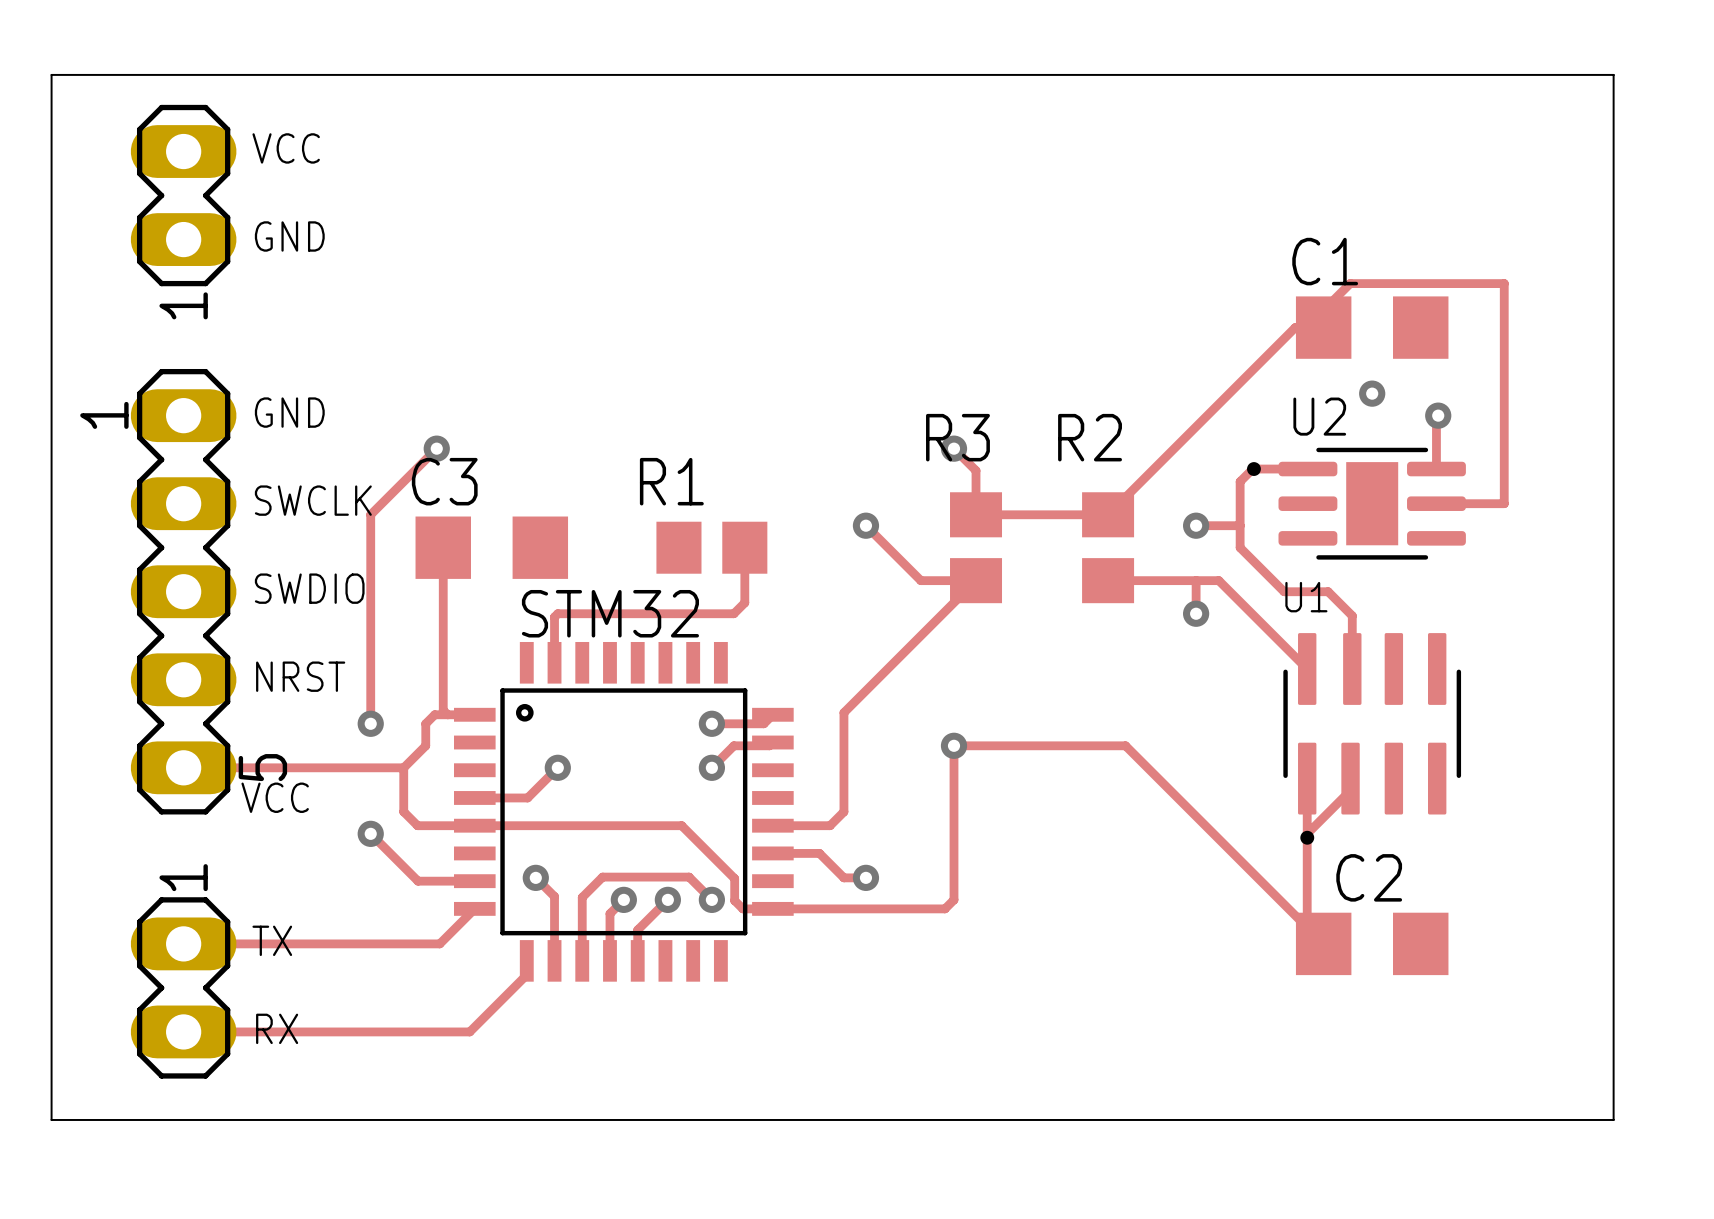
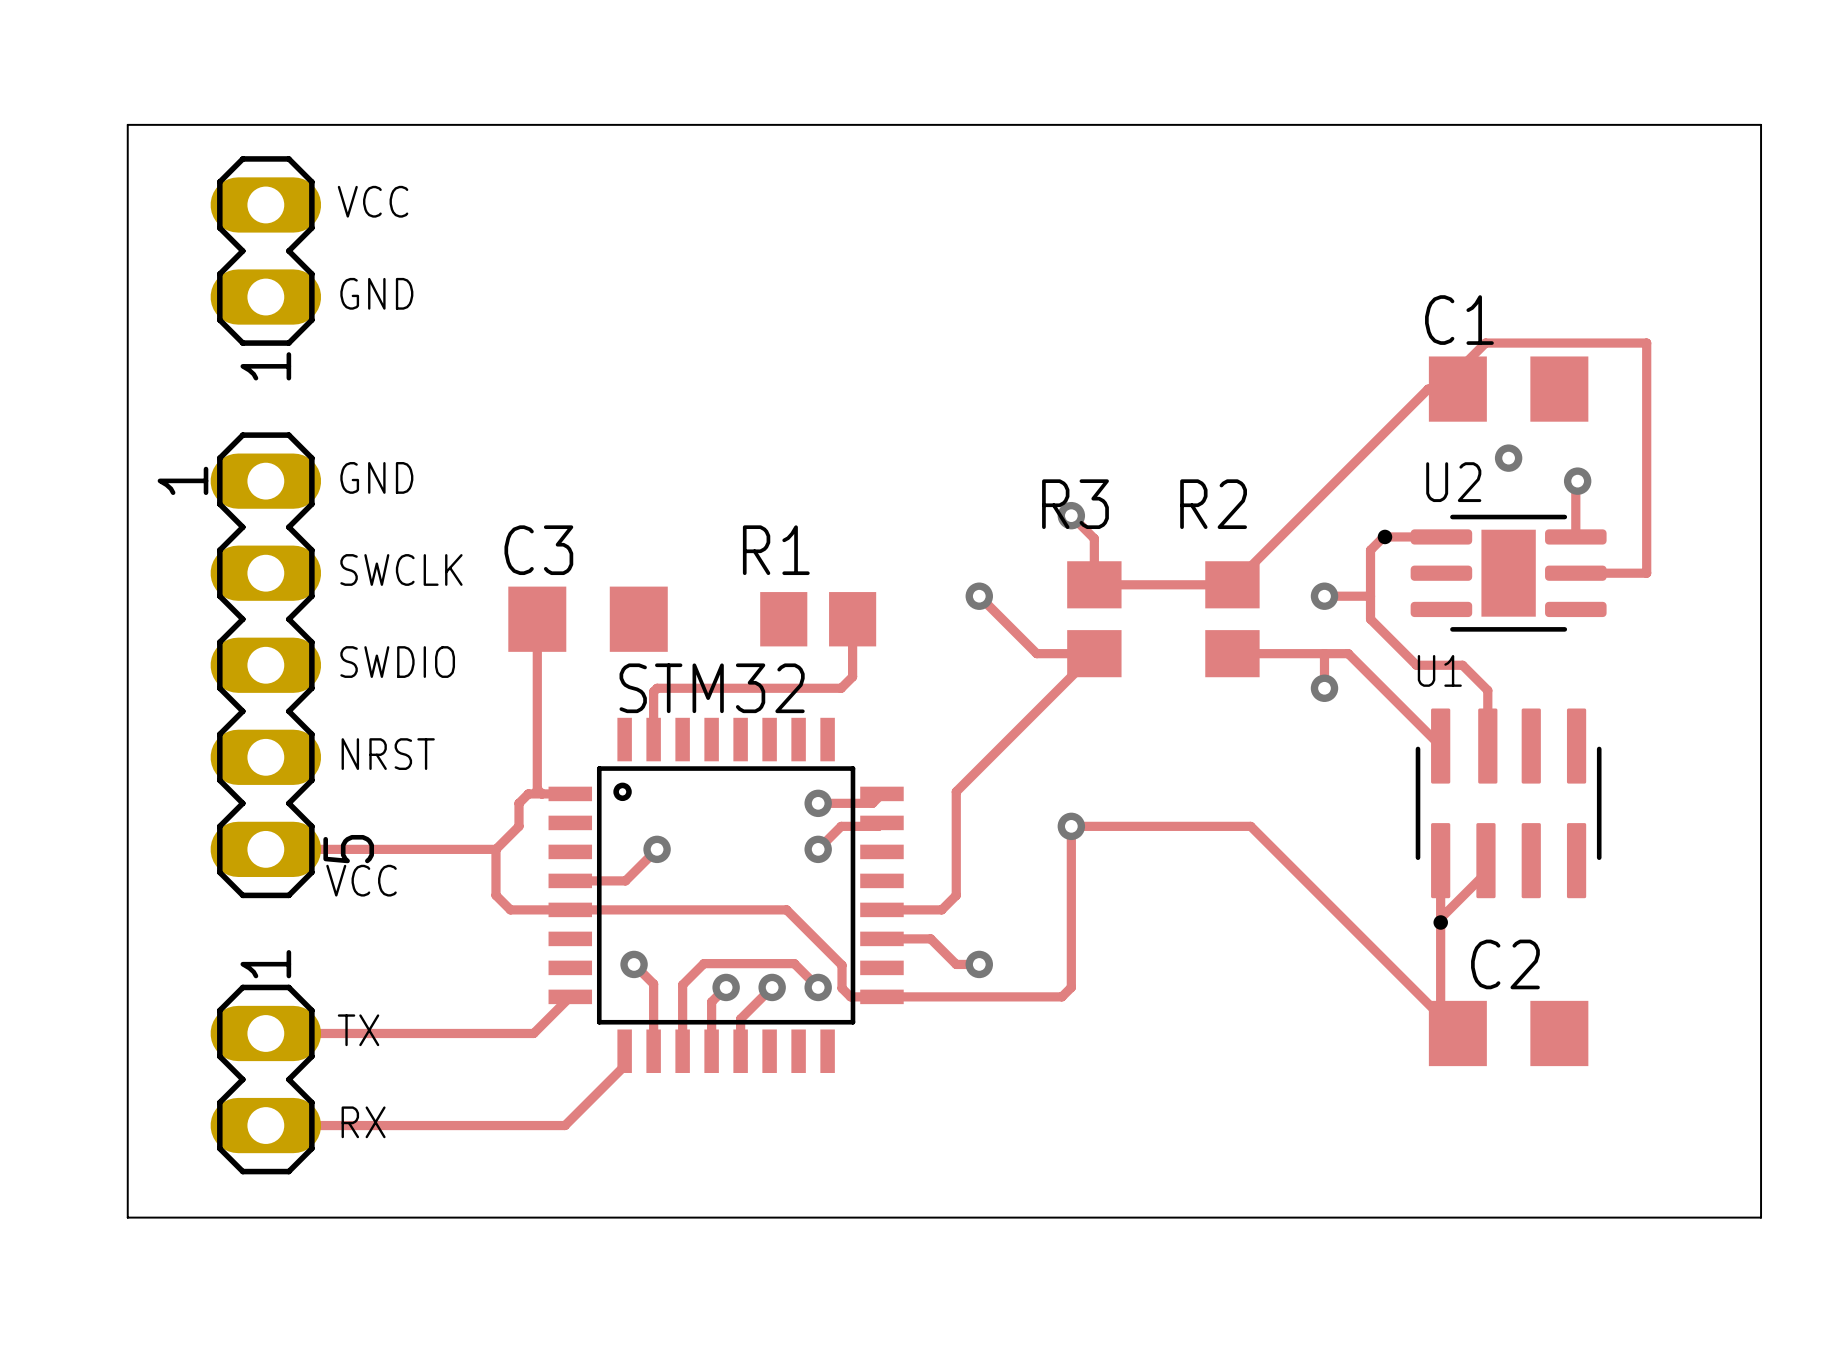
track: (436, 448) (370, 514) (370, 723) -> none
via: (436, 448) -> none
via: (370, 723) -> none
track: (370, 833) (418, 881) (474, 881) -> none
via: (370, 833) -> none

